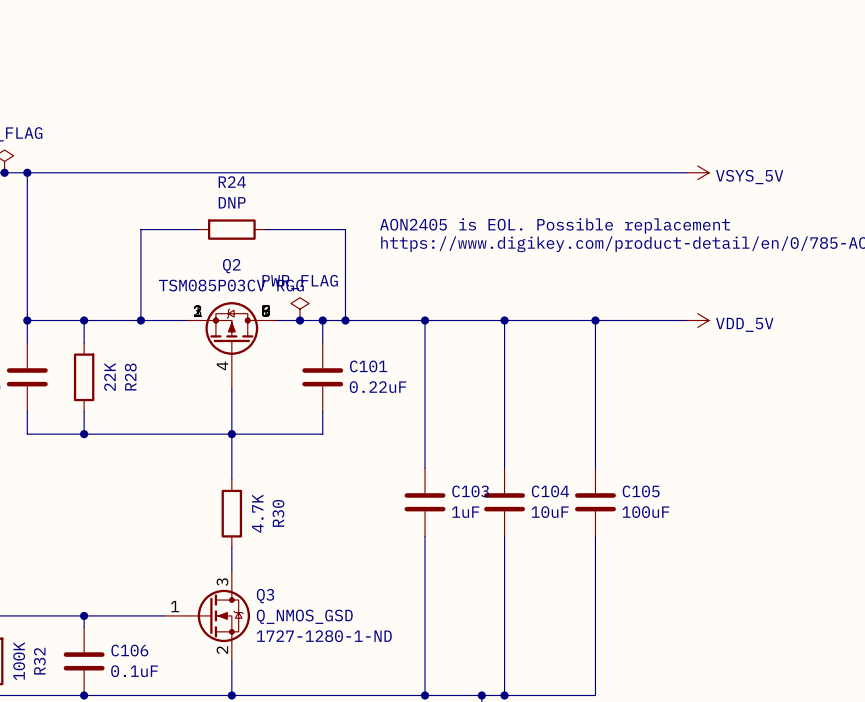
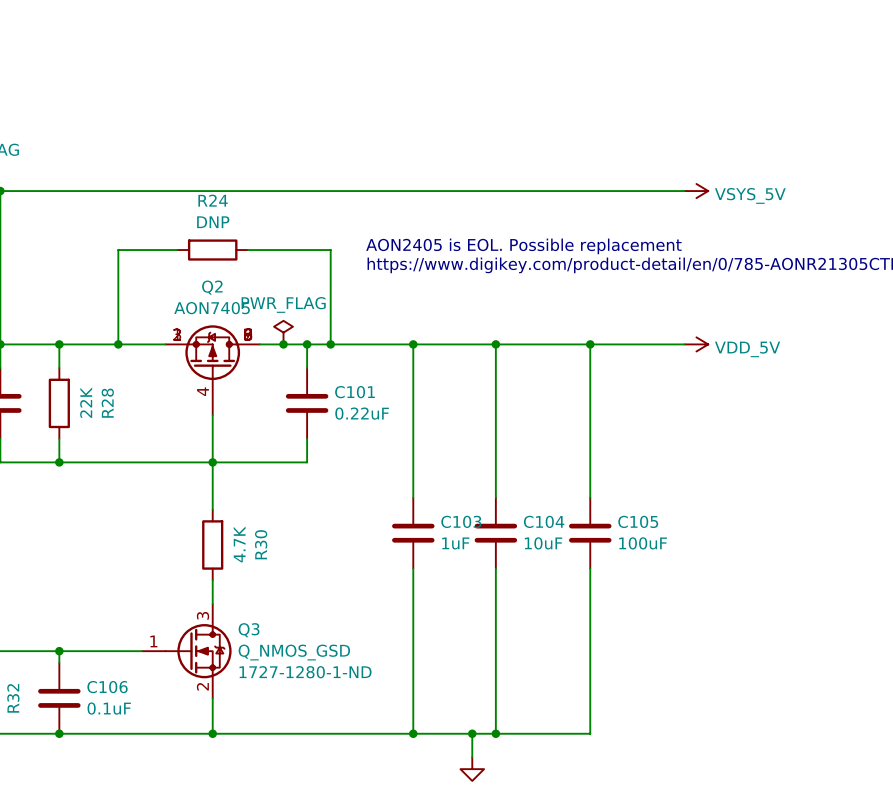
Q2 value: TSM085P03CV RGG (231, 285) -> AON7405 (212, 308)

